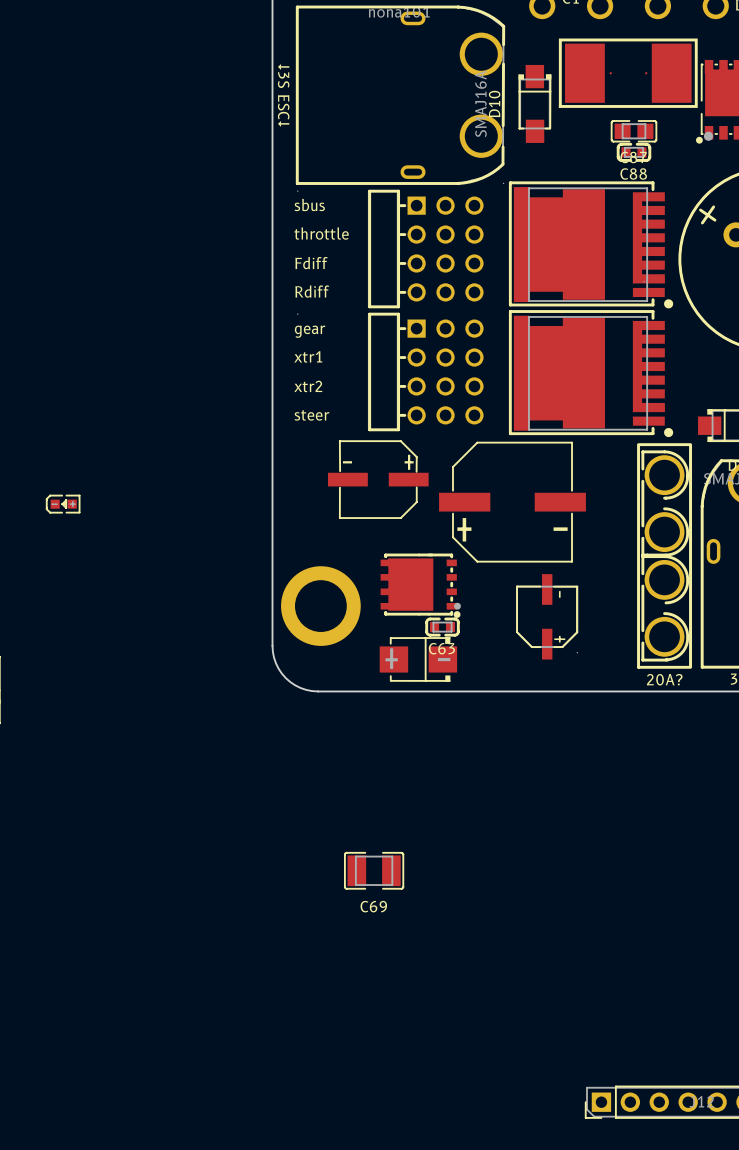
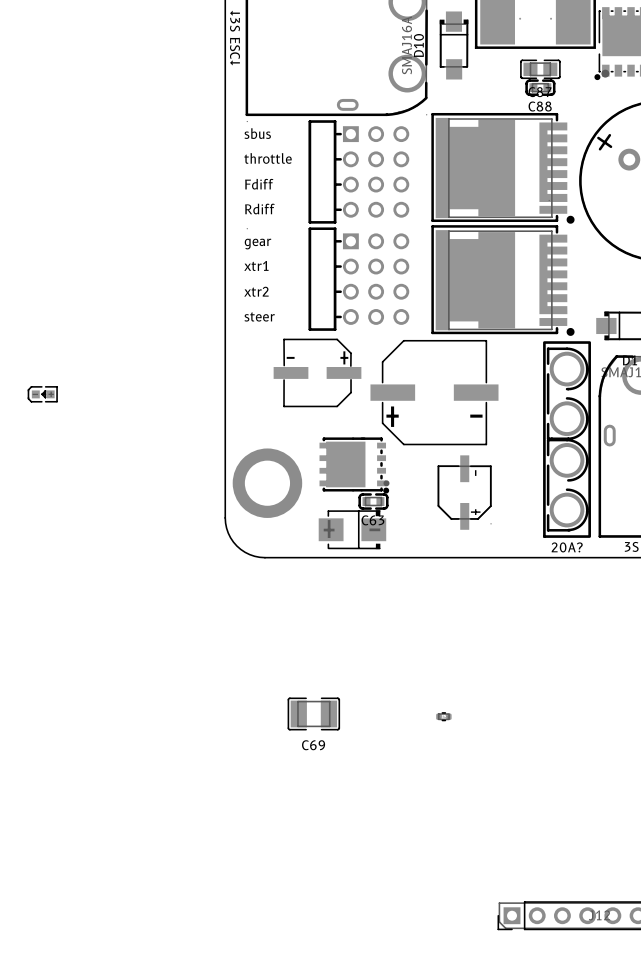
part: none -> (443, 716)

